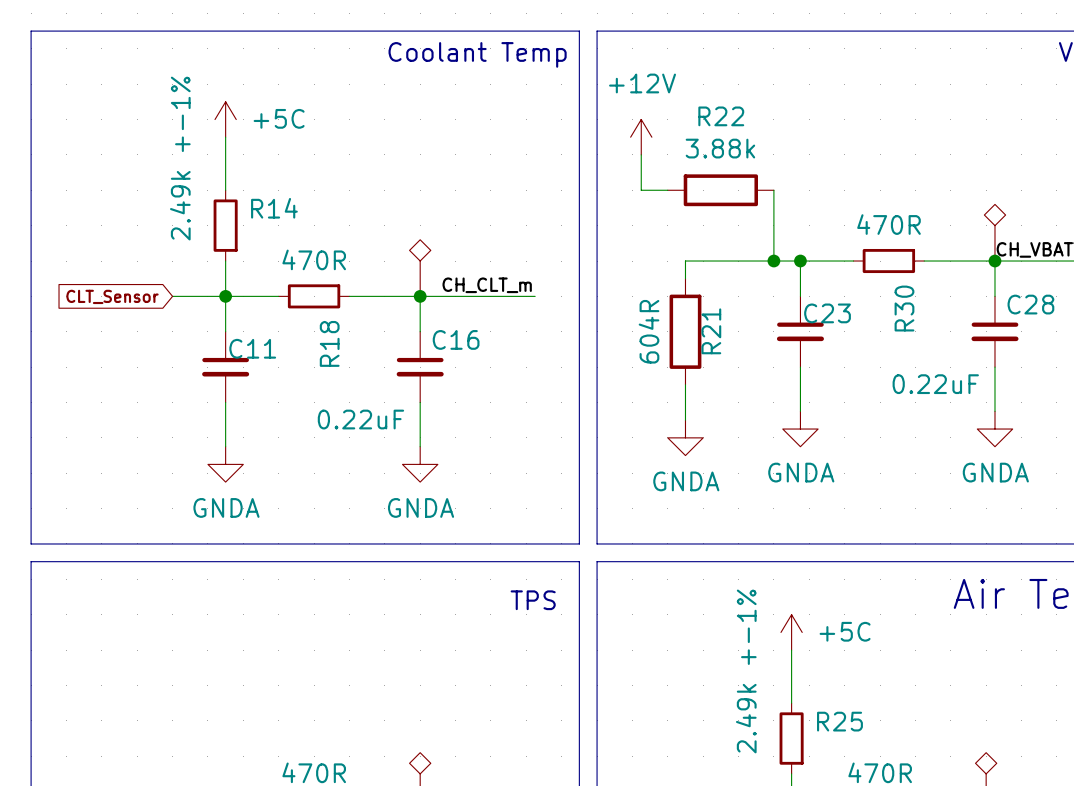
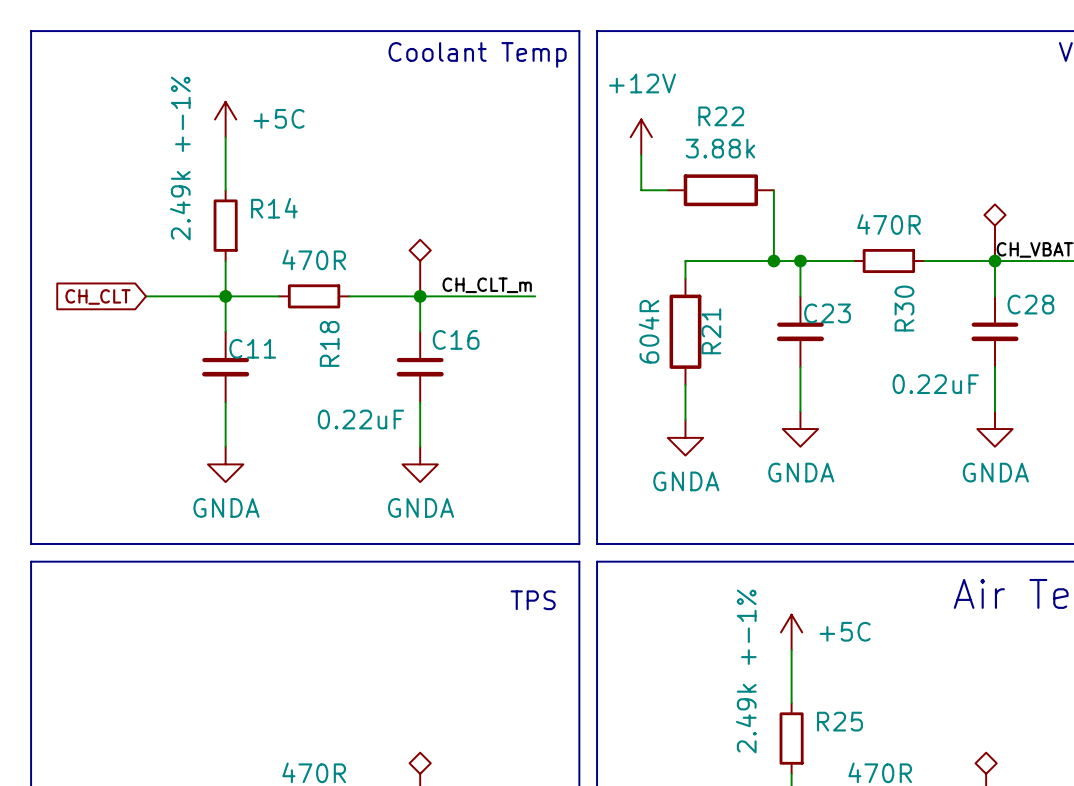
global label: none -> CH_CLT (98, 296)
global label: CLT_Sensor (112, 296) -> none
wire: none -> (146, 296) (172, 296)

